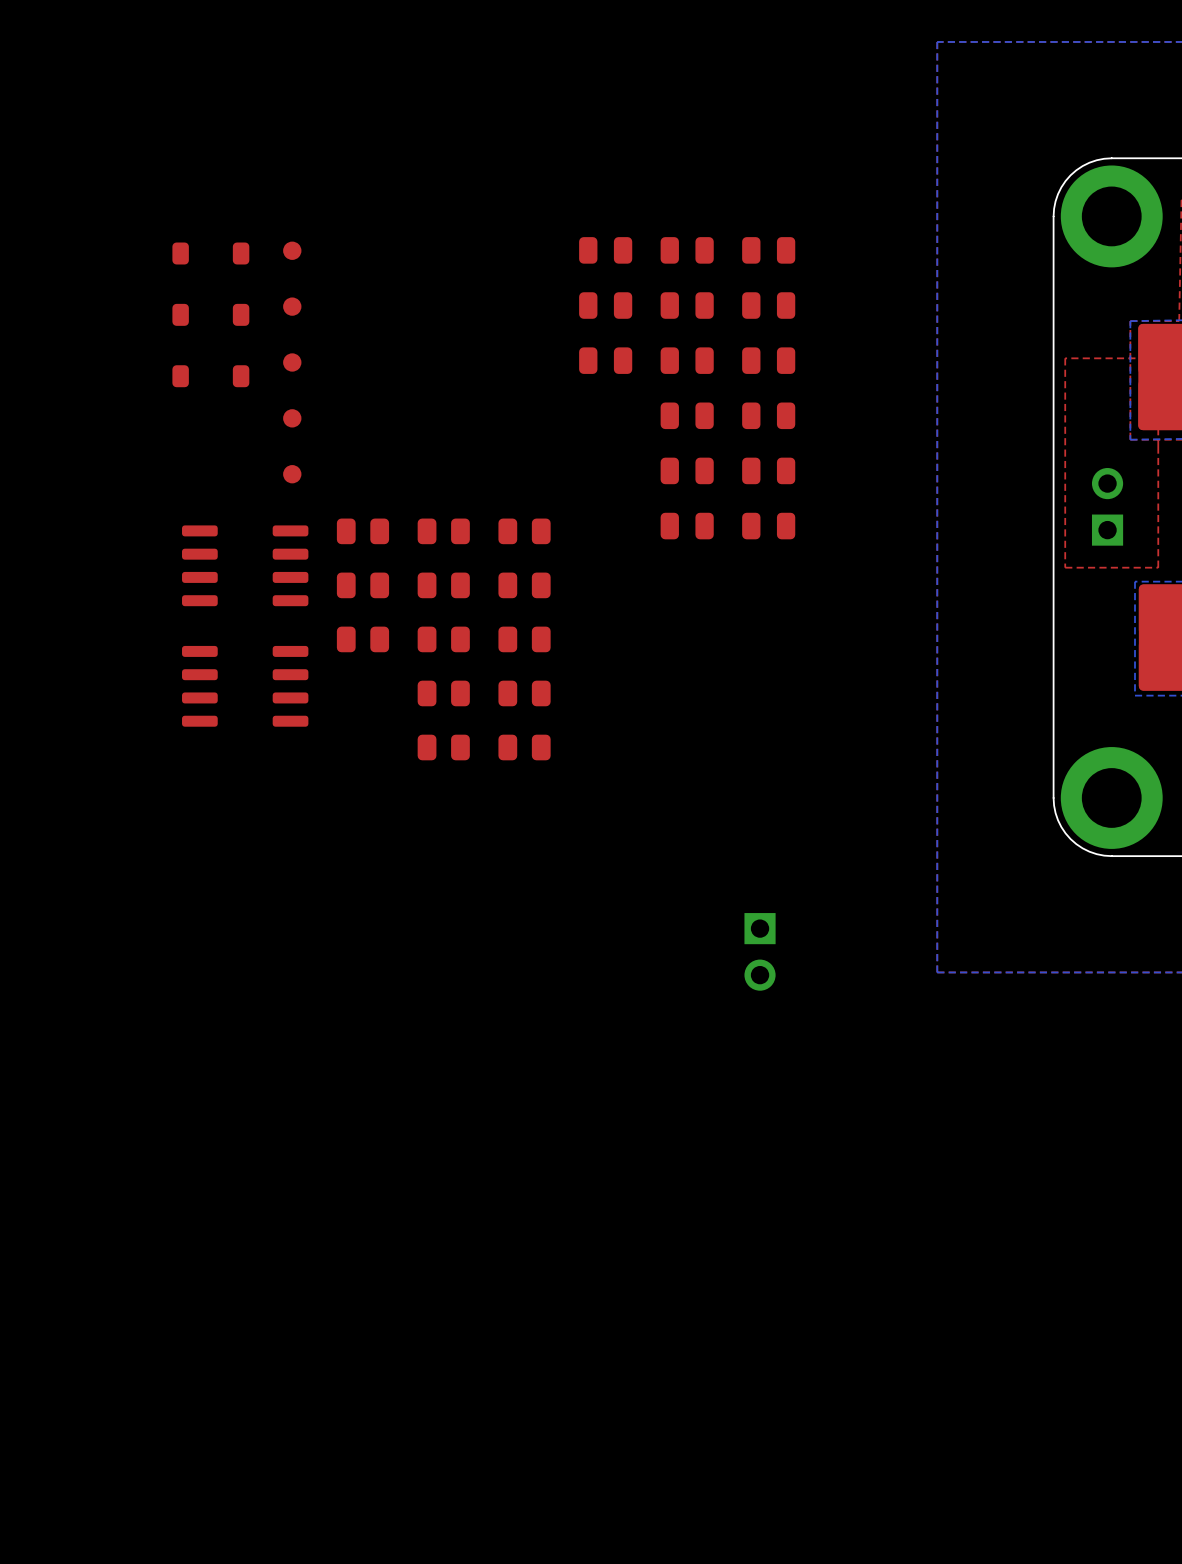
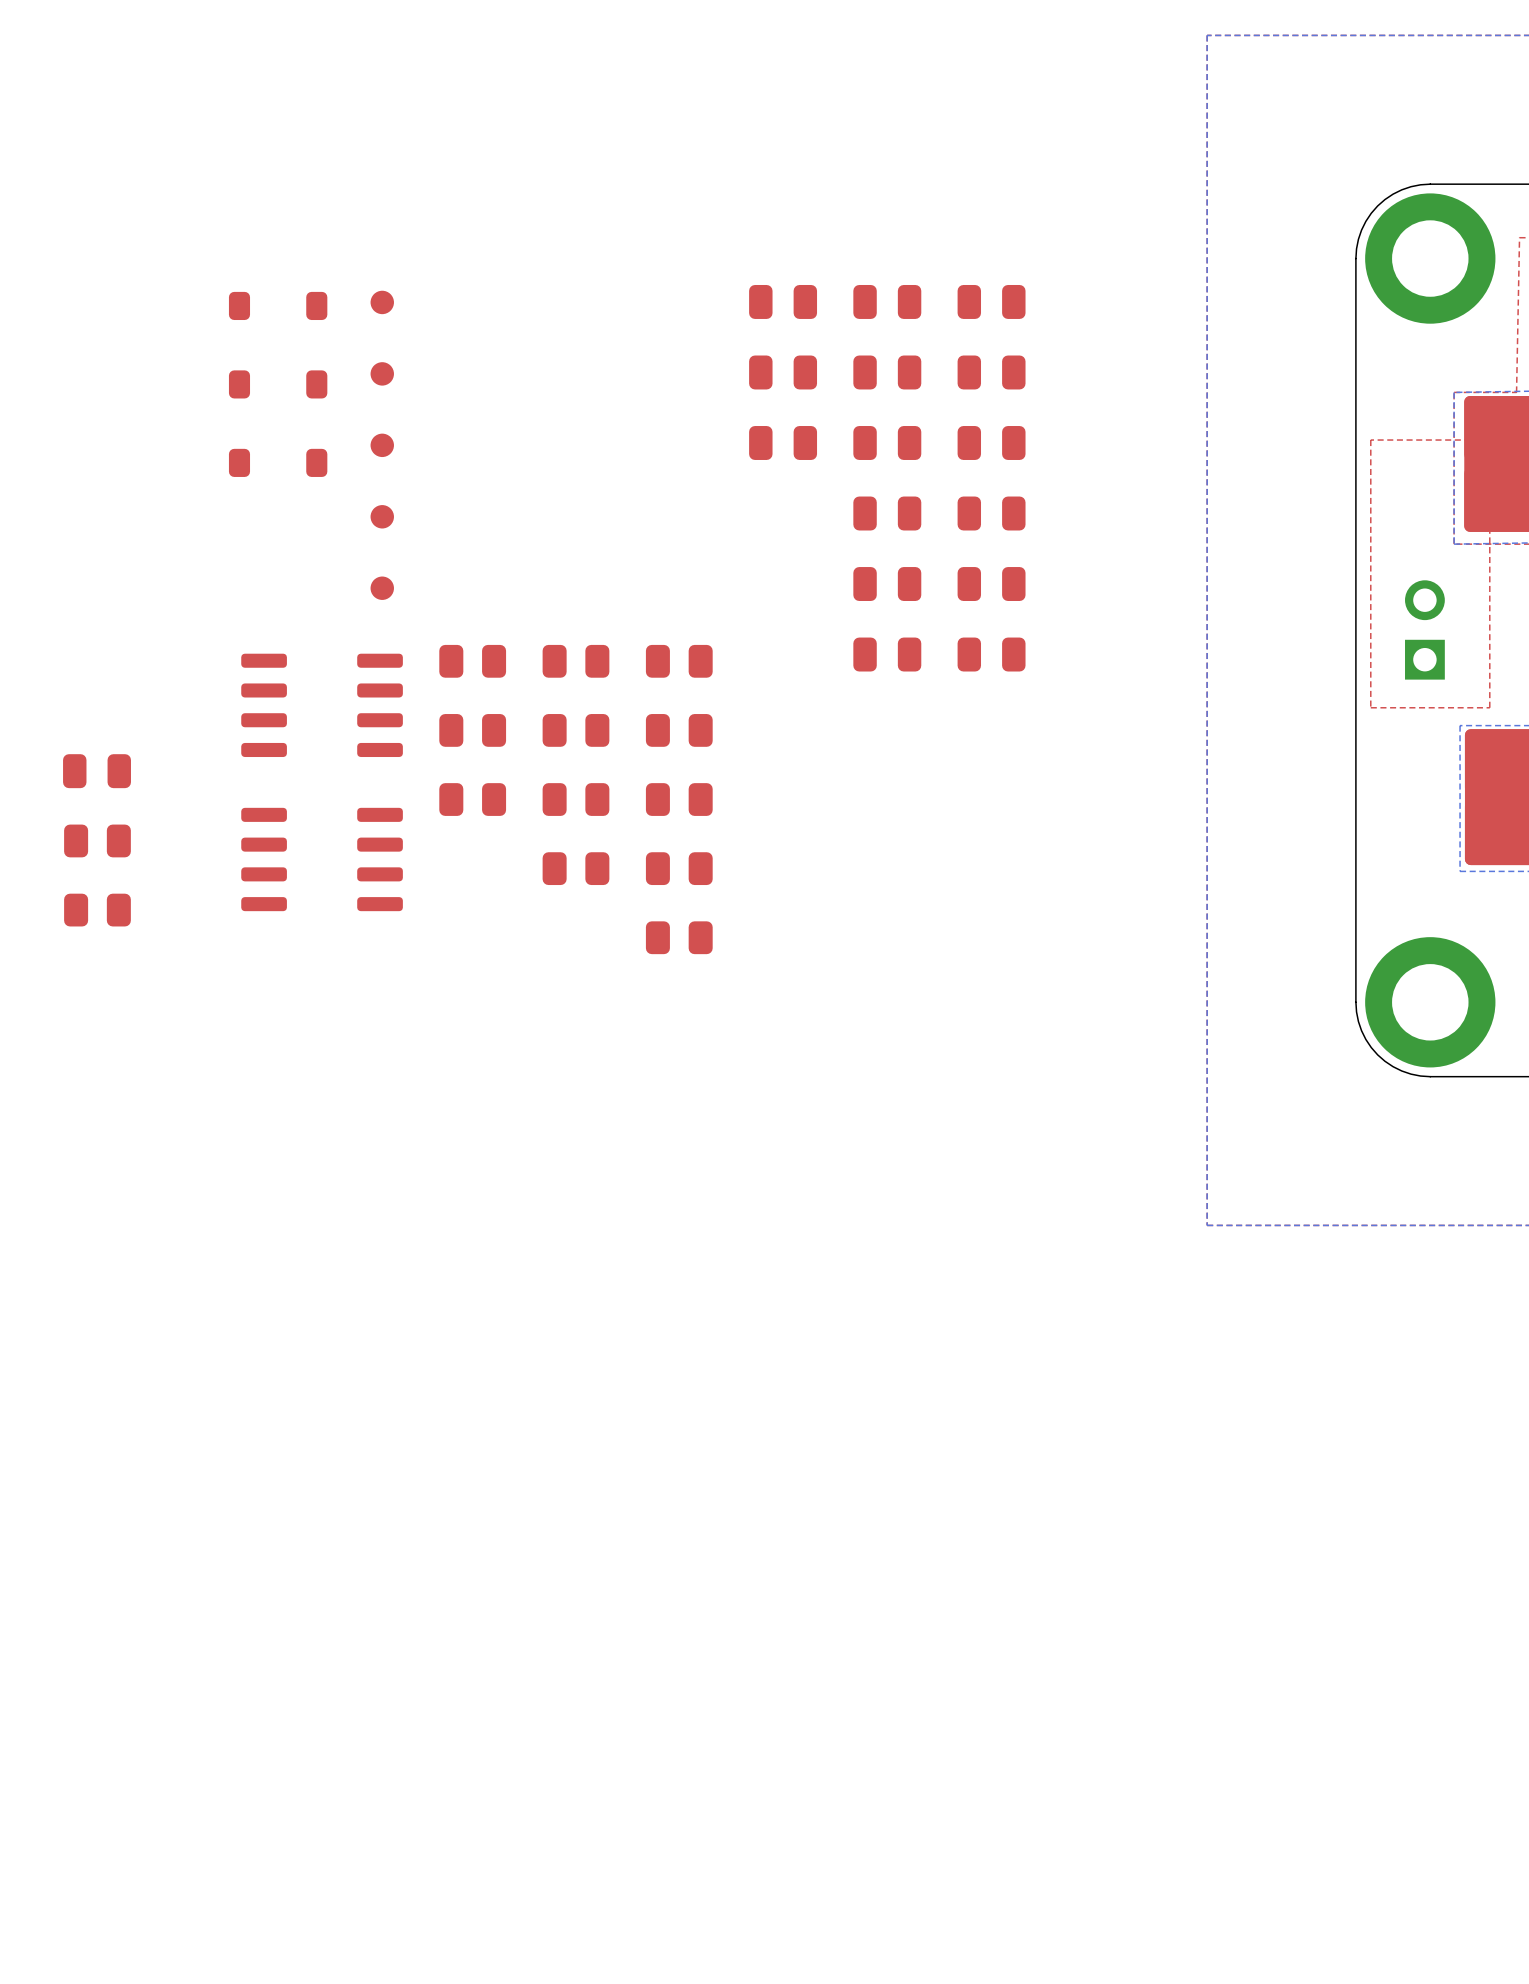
part: none -> (97, 771)
part: none -> (97, 840)
part: none -> (97, 910)
part: (443, 747) -> none
part: (760, 951) -> none

